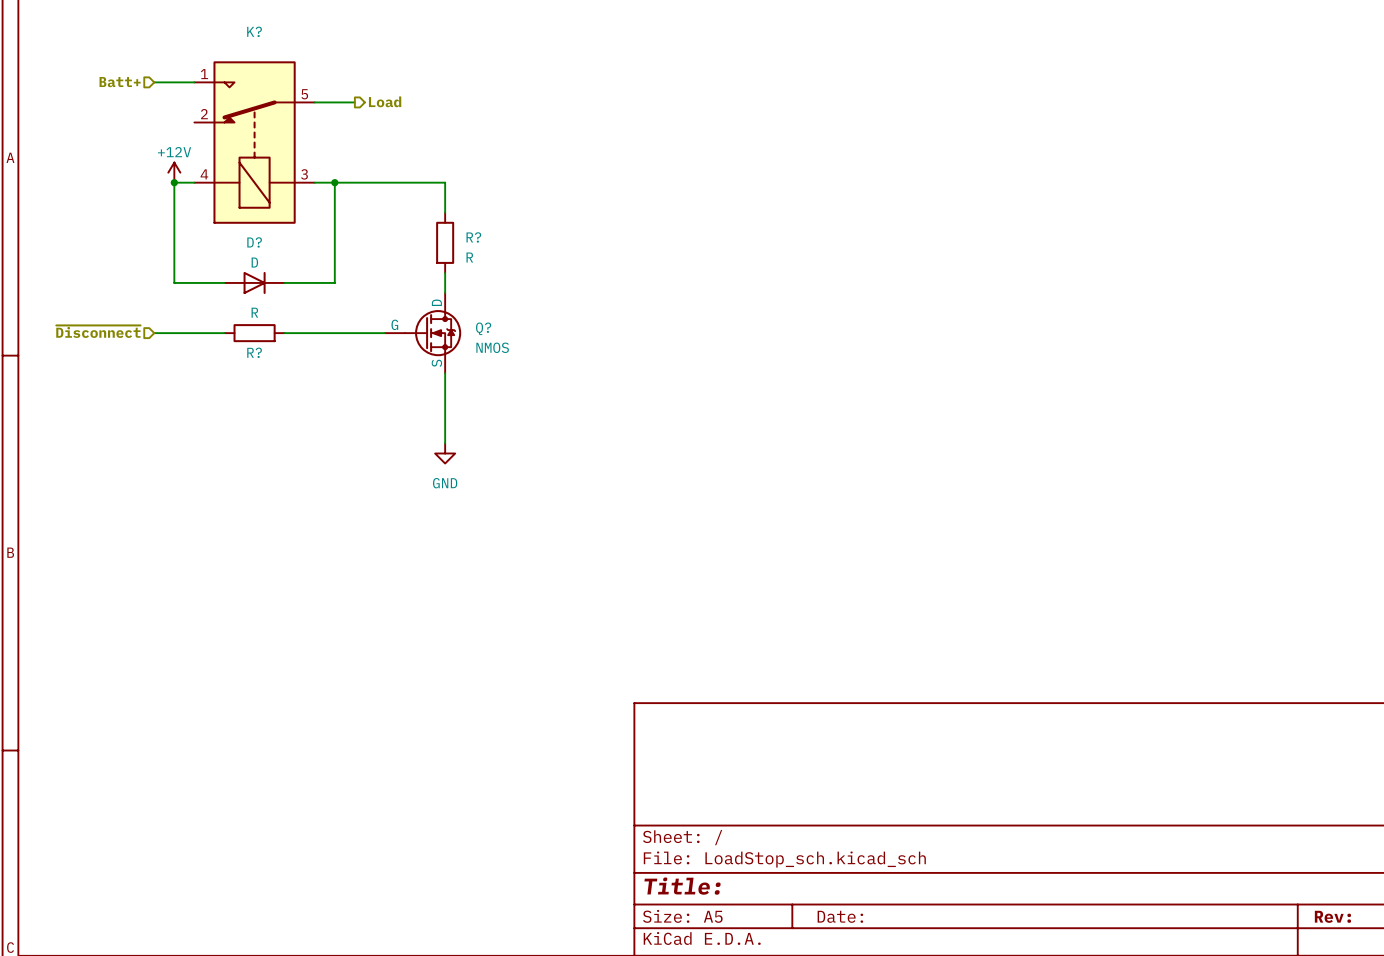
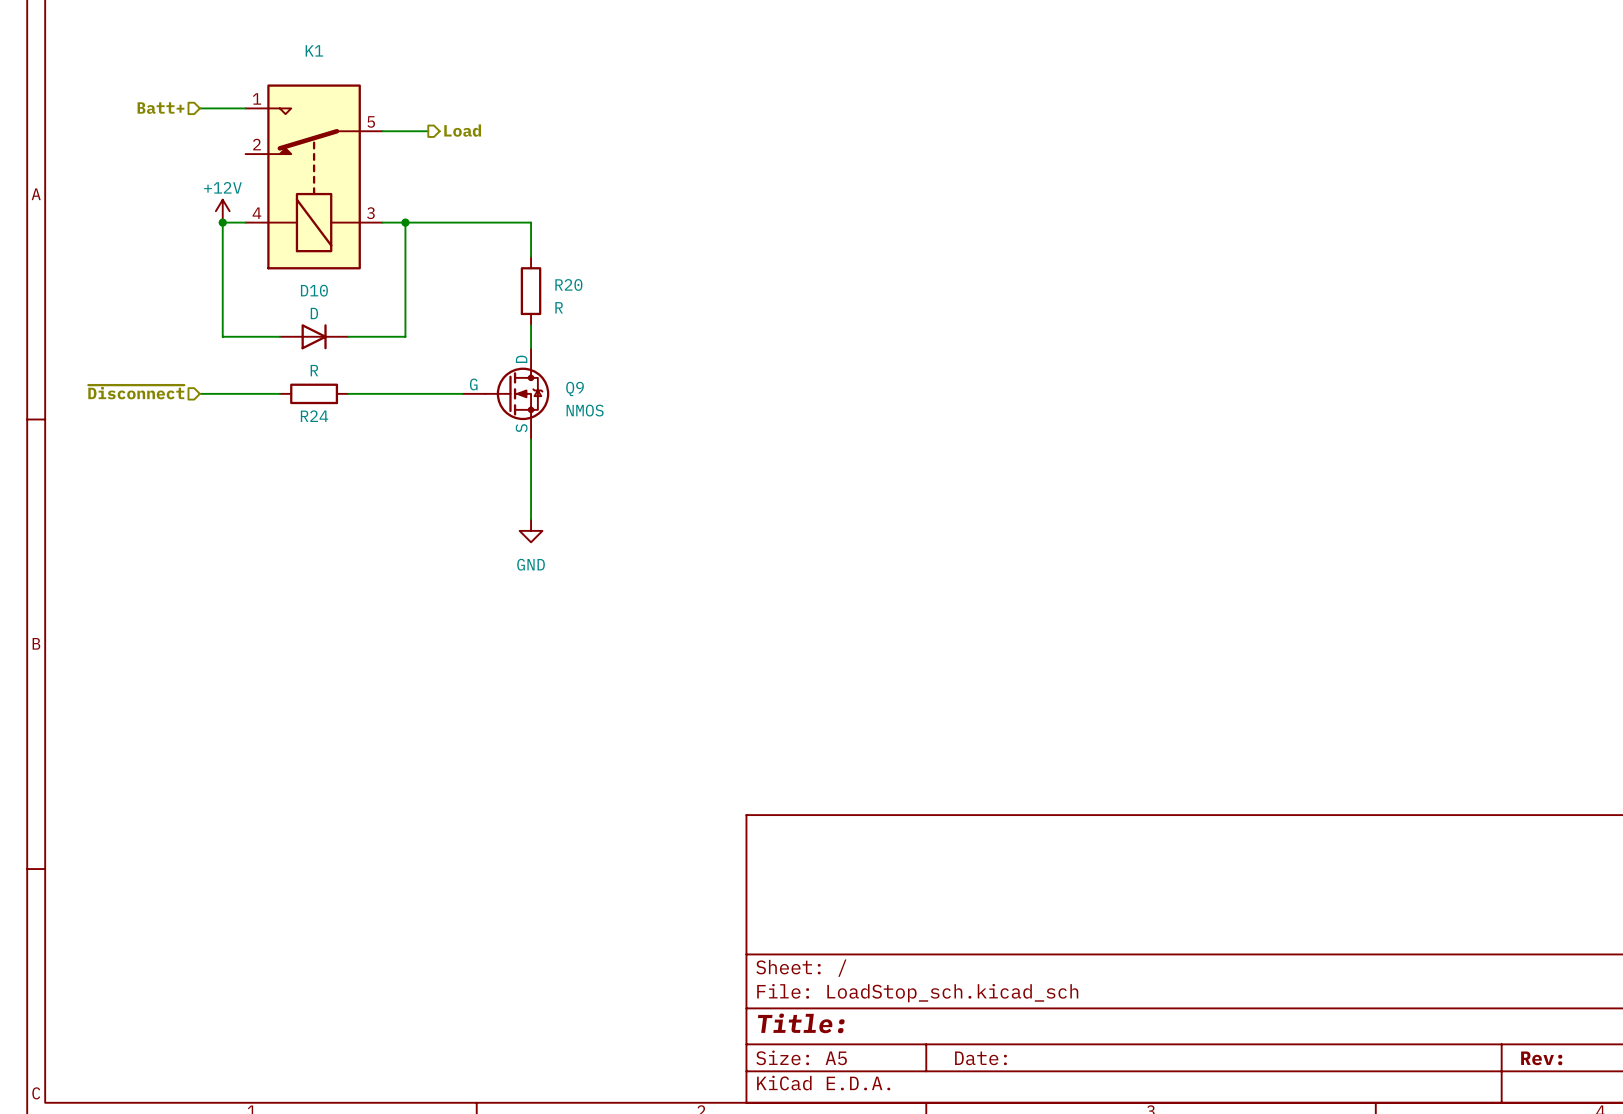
K? name: K? (254, 31) -> K1 (314, 50)
R? name: R? (473, 237) -> R20 (568, 284)
D? name: D? (254, 242) -> D10 (314, 290)
Q? name: Q? (483, 328) -> Q9 (575, 388)
R? name: R? (254, 352) -> R24 (314, 416)

